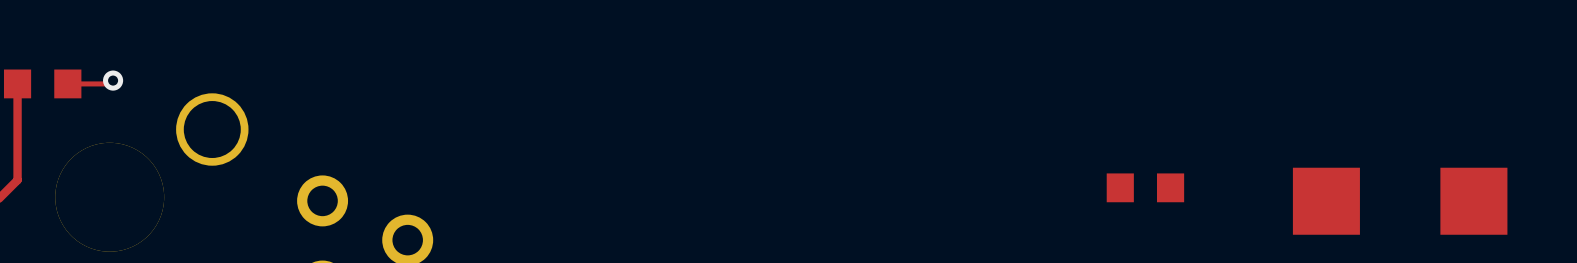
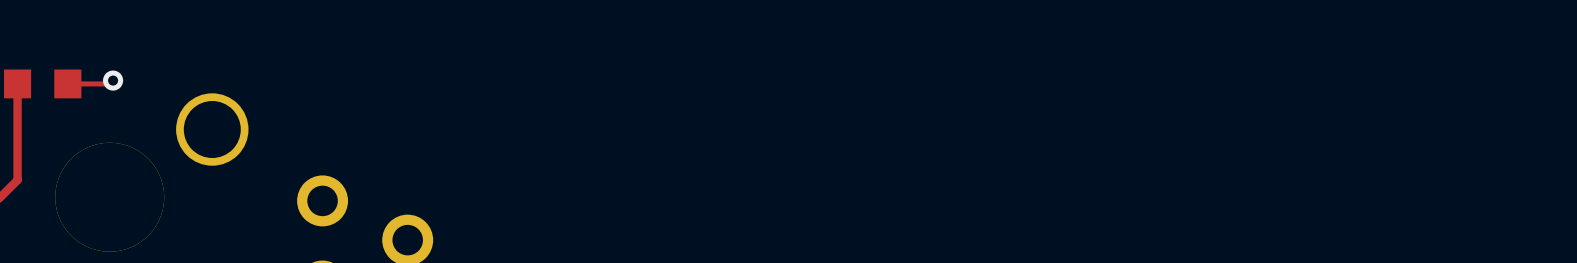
part: (1145, 187) -> none
part: (1400, 201) -> none

